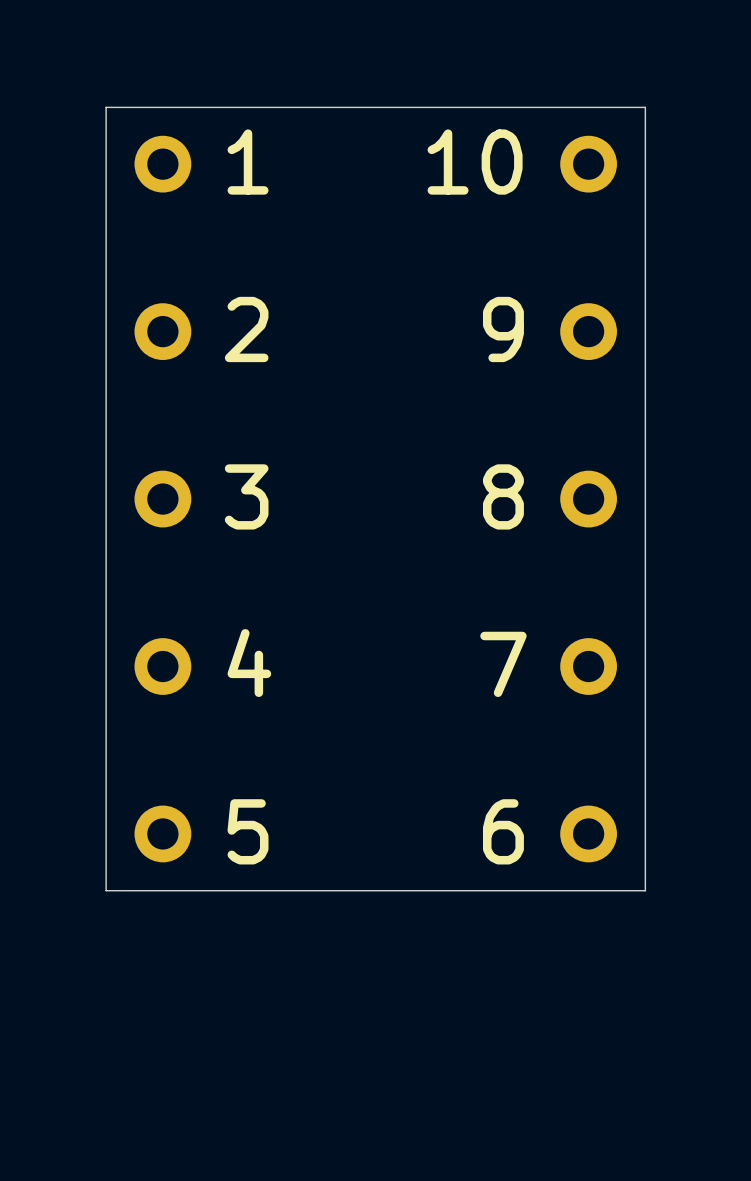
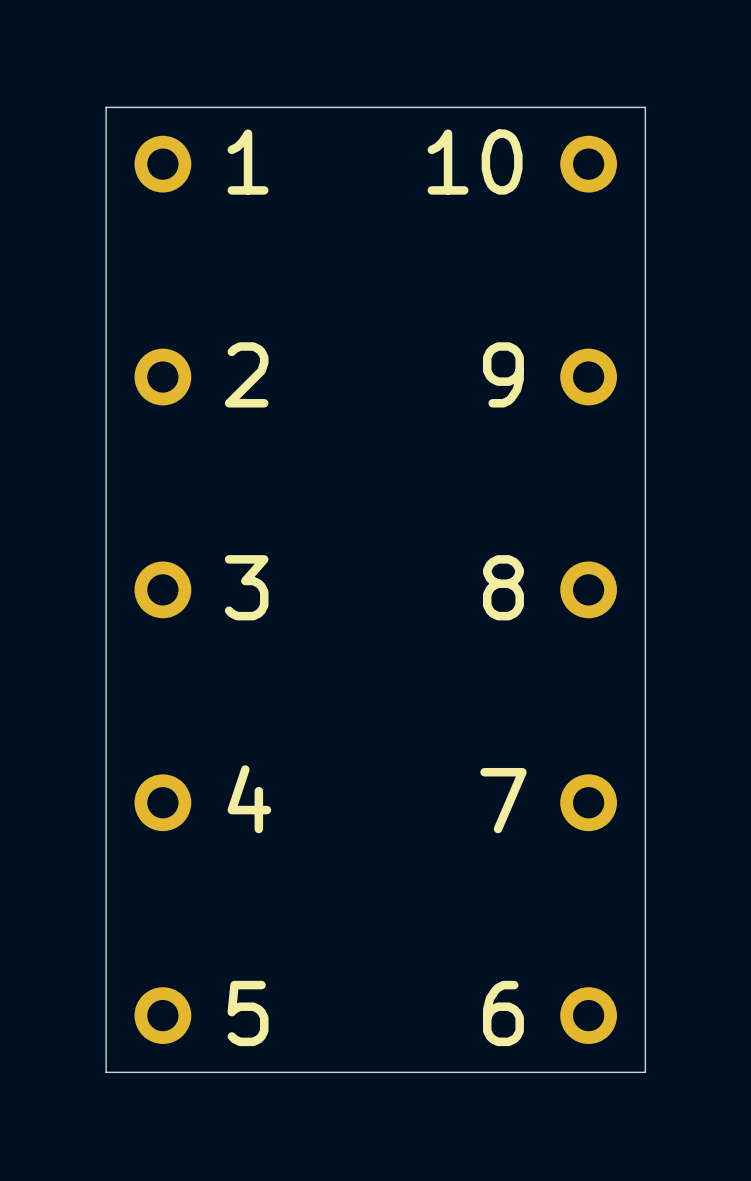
part position: (162, 331) -> (162, 377)
part position: (588, 331) -> (588, 377)
part position: (162, 499) -> (162, 589)
part position: (588, 499) -> (588, 589)
part position: (162, 666) -> (162, 802)
part position: (588, 666) -> (588, 802)
part position: (162, 833) -> (162, 1015)
part position: (588, 833) -> (588, 1015)
board edge: (106, 890) (645, 890) -> (106, 890) (106, 1072) (645, 1072) (645, 890)

